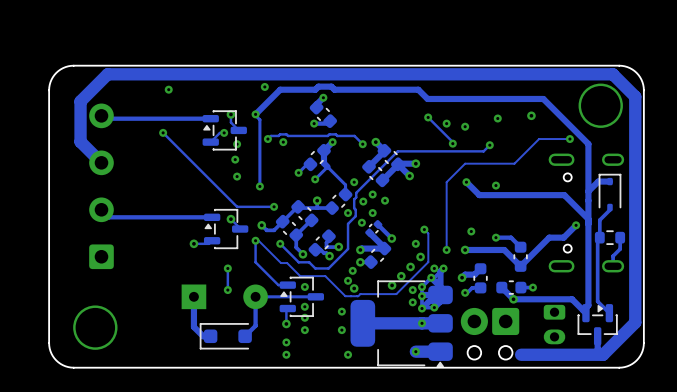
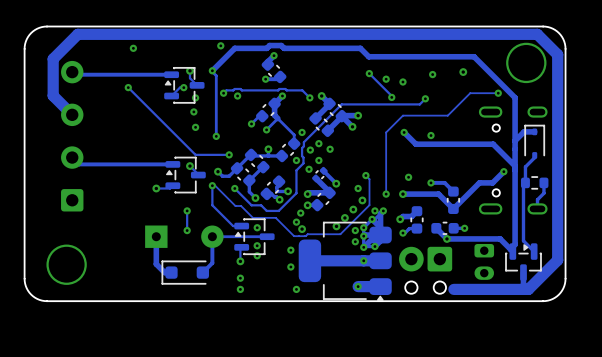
via: (304, 330) -> none

